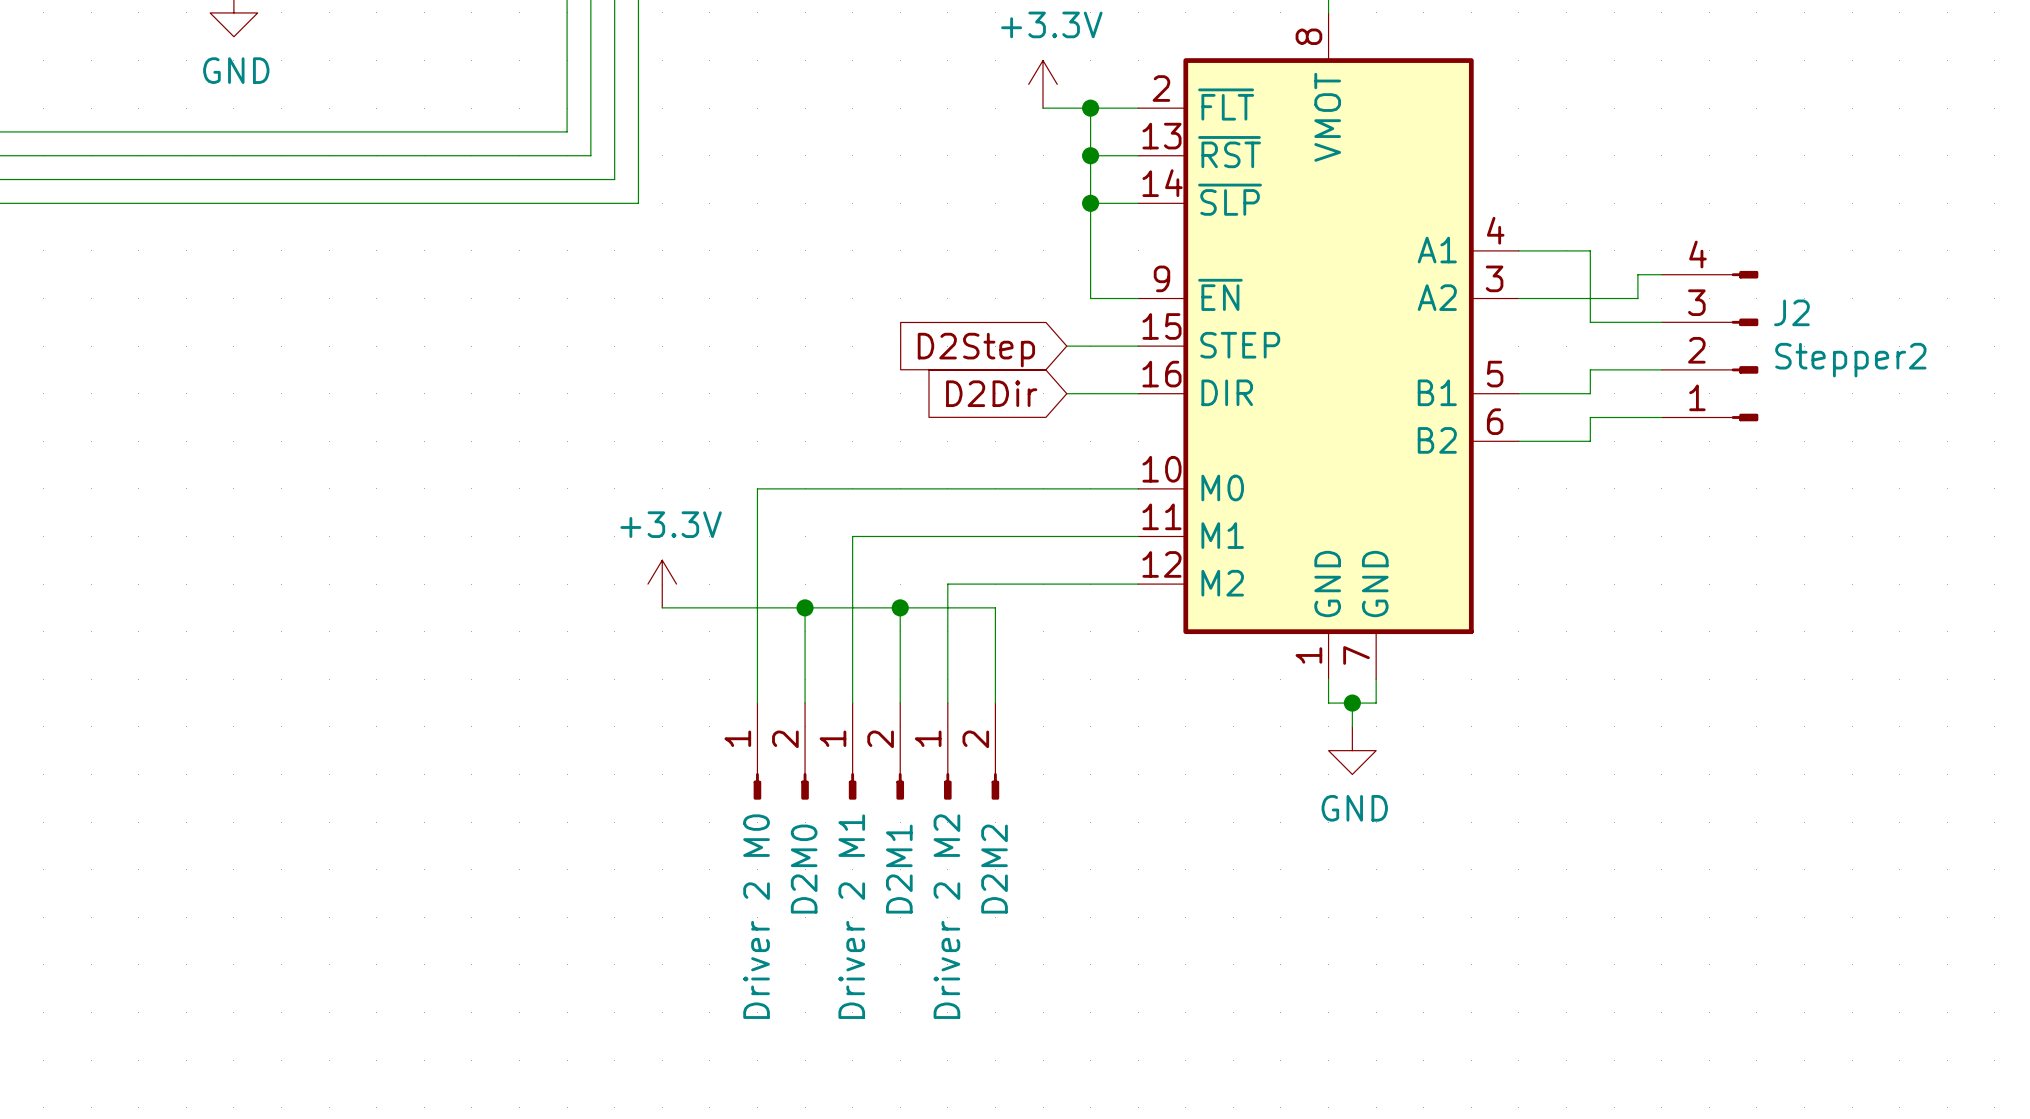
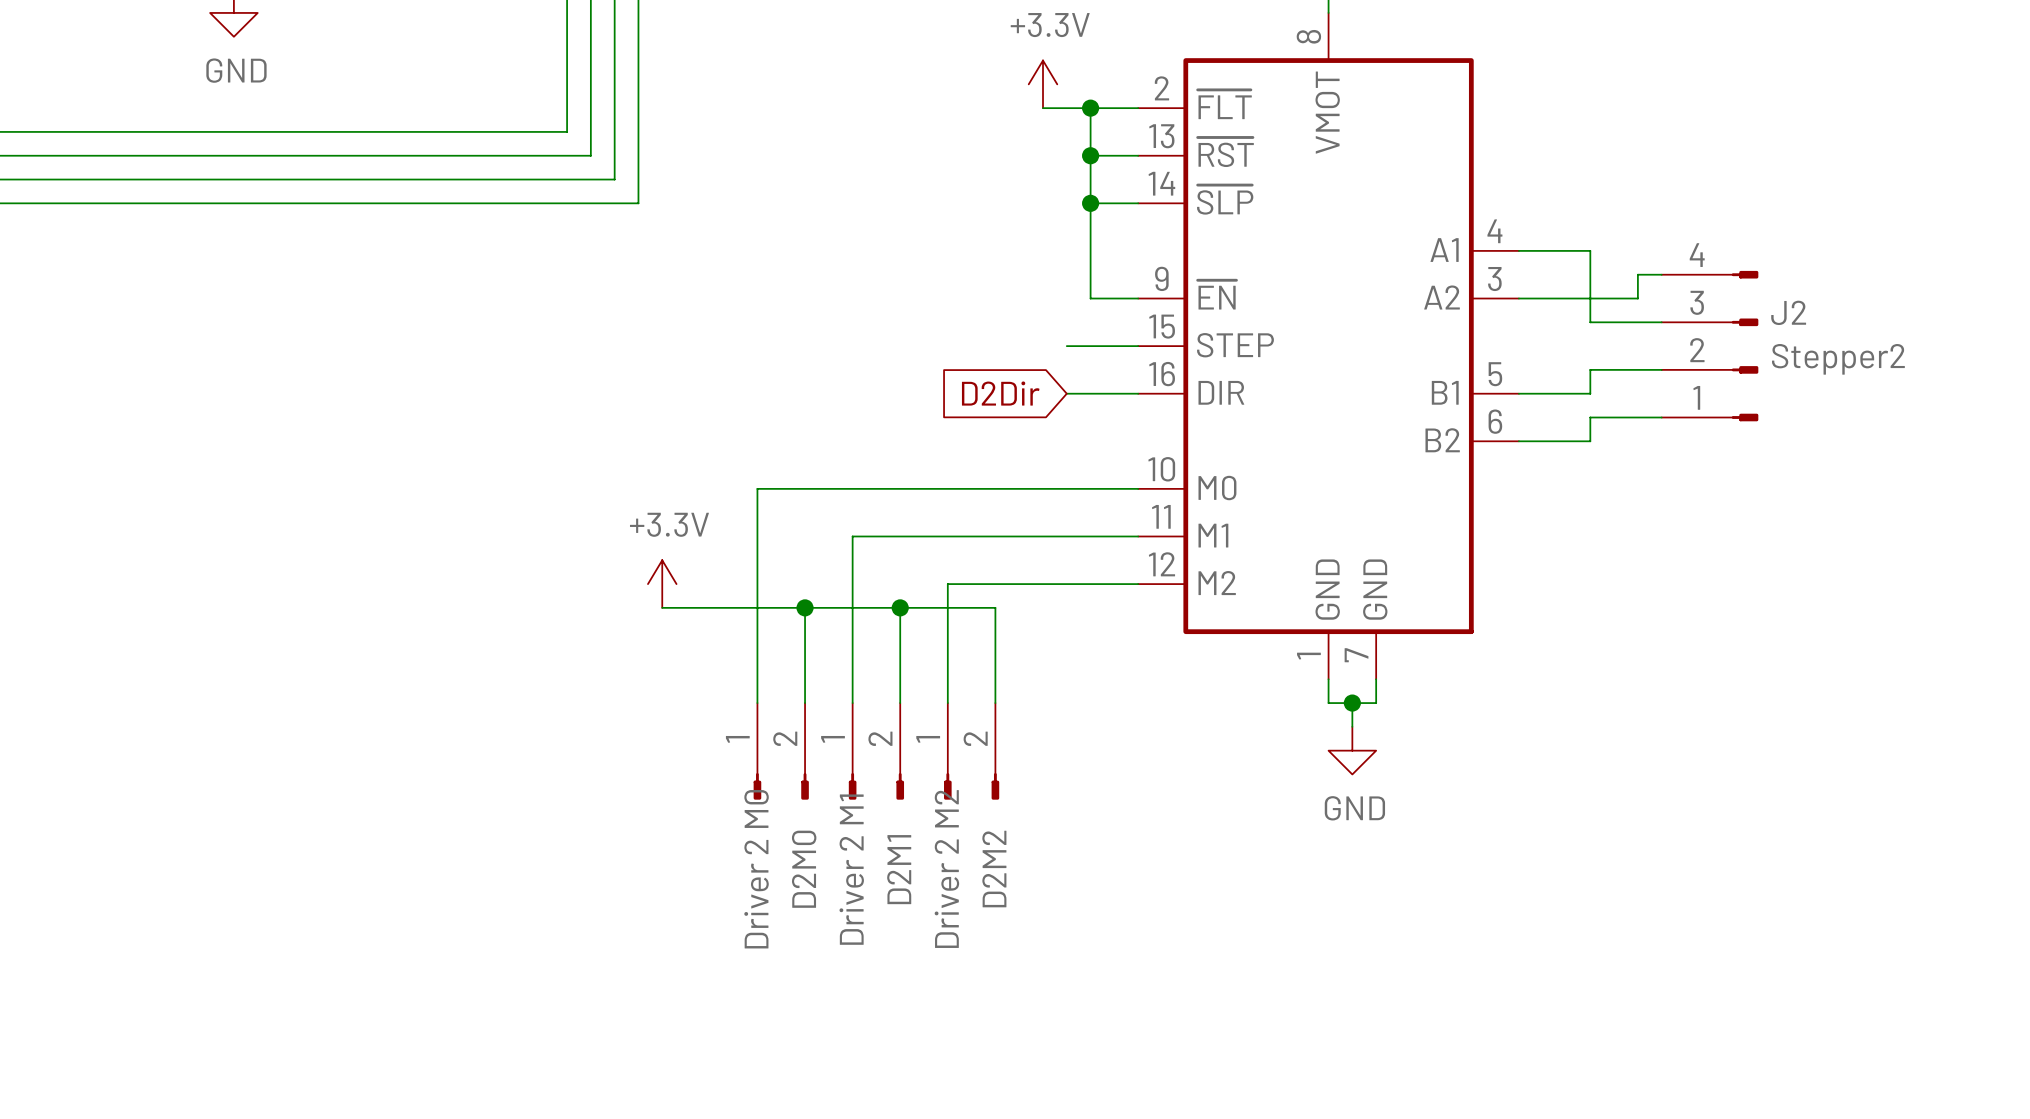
global label: D2Step (976, 350) -> none
D2M0 value position: Driver 2 M0 (756, 916) -> Driver 2 M0 (756, 869)
D2M1 value position: Driver 2 M1 (851, 916) -> Driver 2 M1 (851, 869)
D2M2 value position: Driver 2 M2 (946, 916) -> Driver 2 M2 (946, 869)

